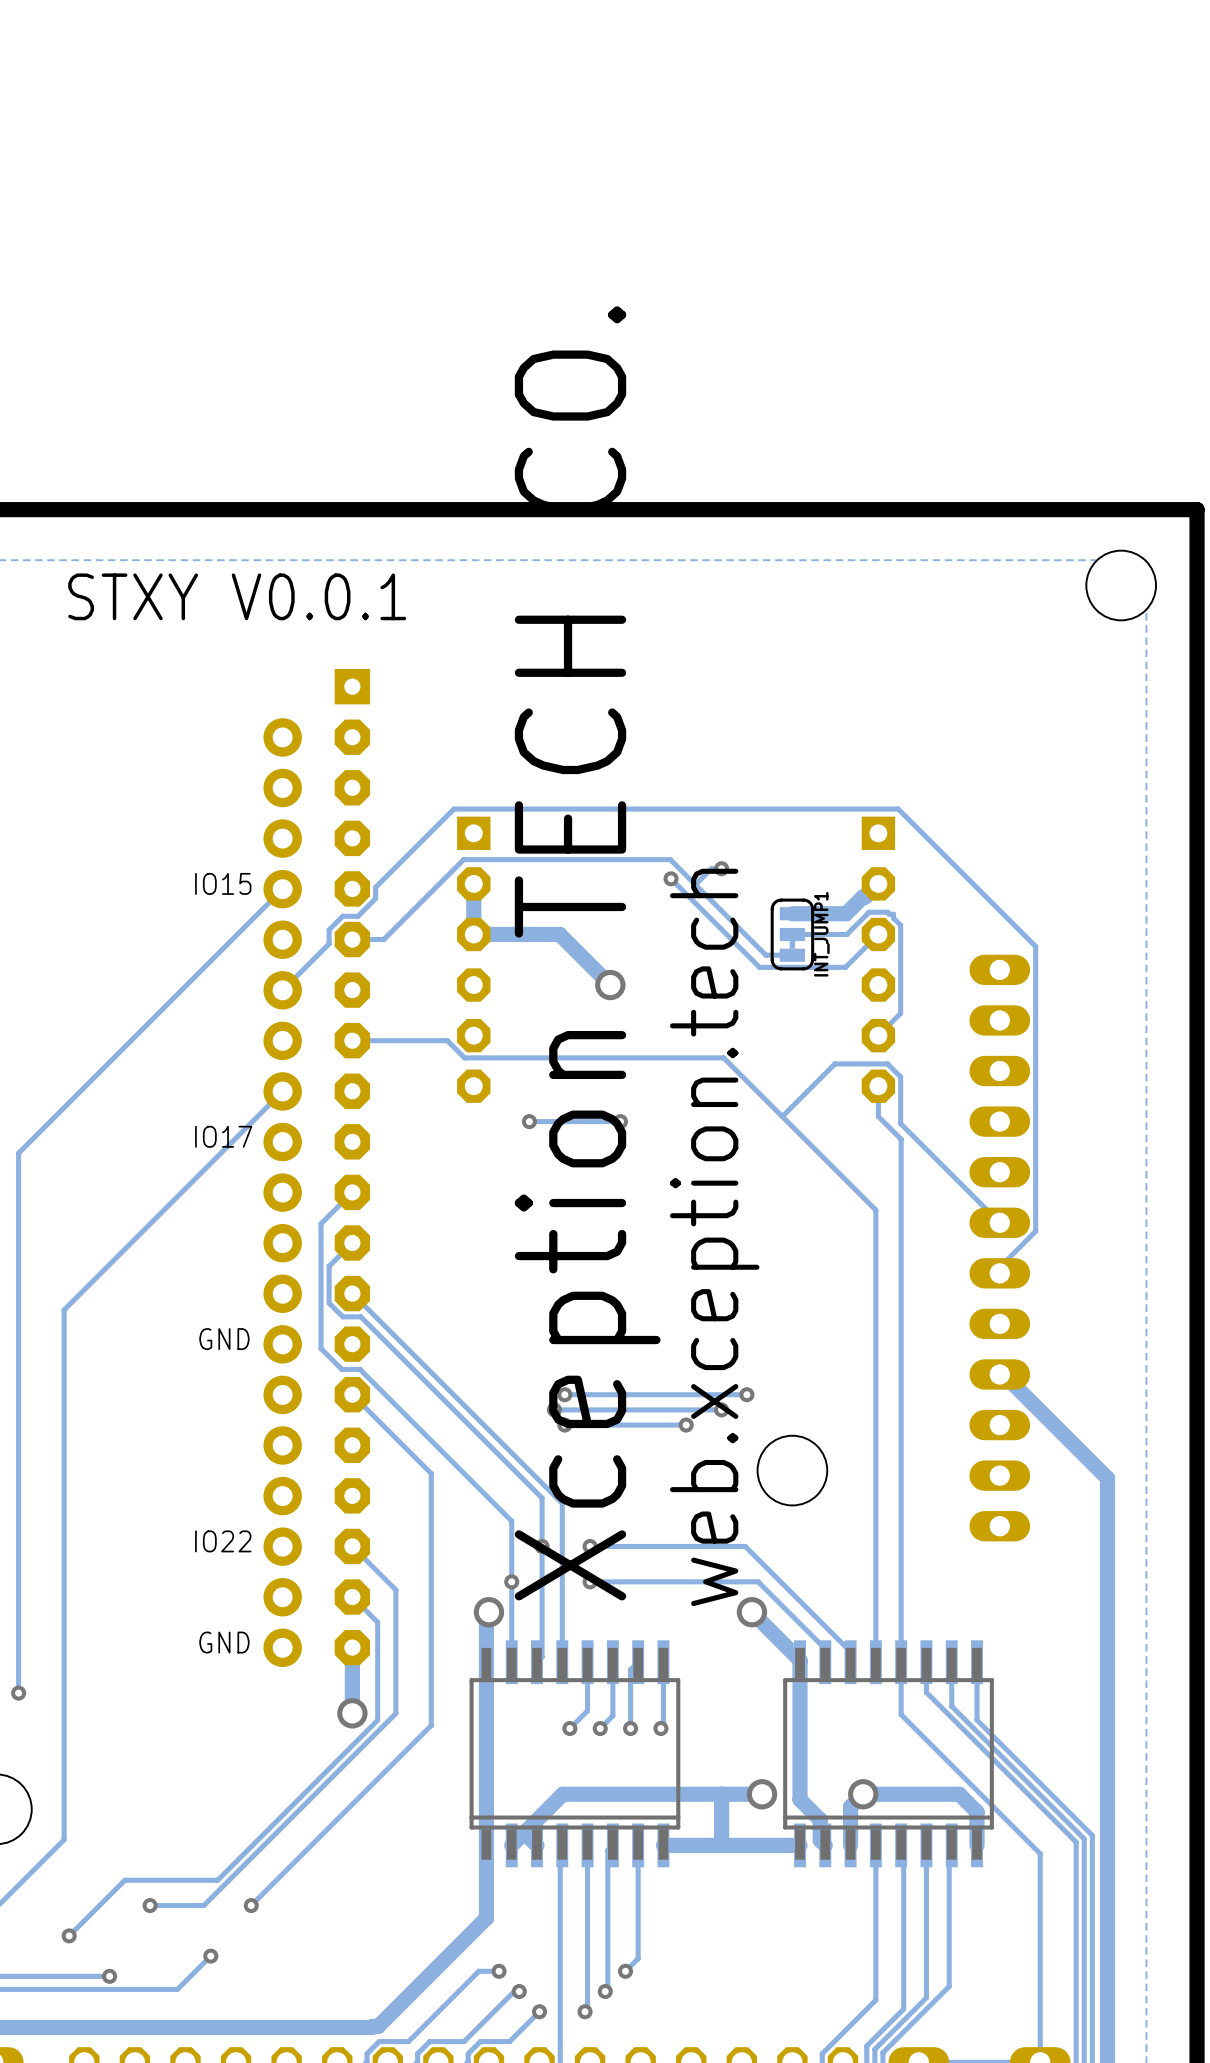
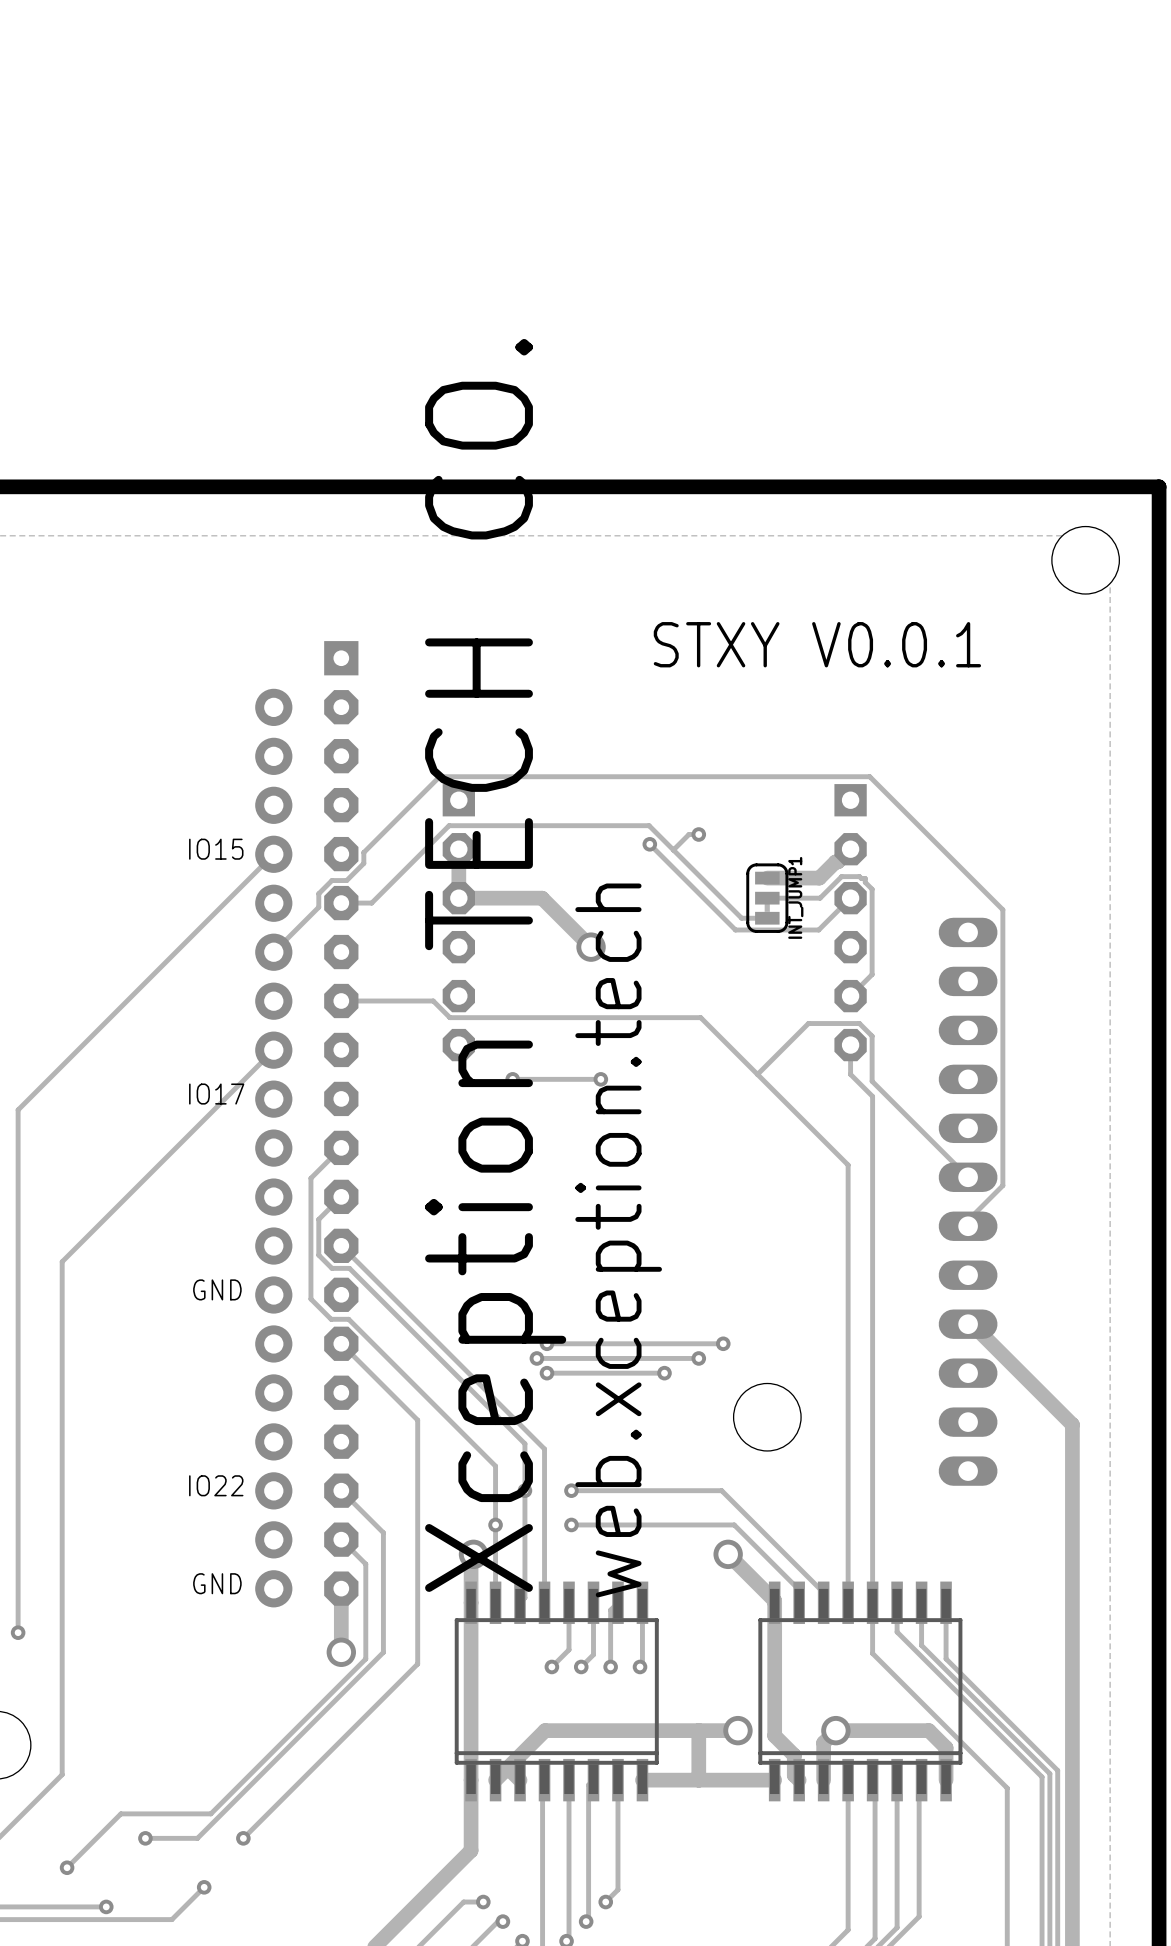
text: STXY V0.0.1 (237, 596) -> none
text: none -> STXY V0.0.1 (817, 644)
text position: Xception TECH CO. (587, 953) -> Xception TECH CO. (495, 965)
text position: web.xception.tech (714, 1237) -> web.xception.tech (618, 1240)

